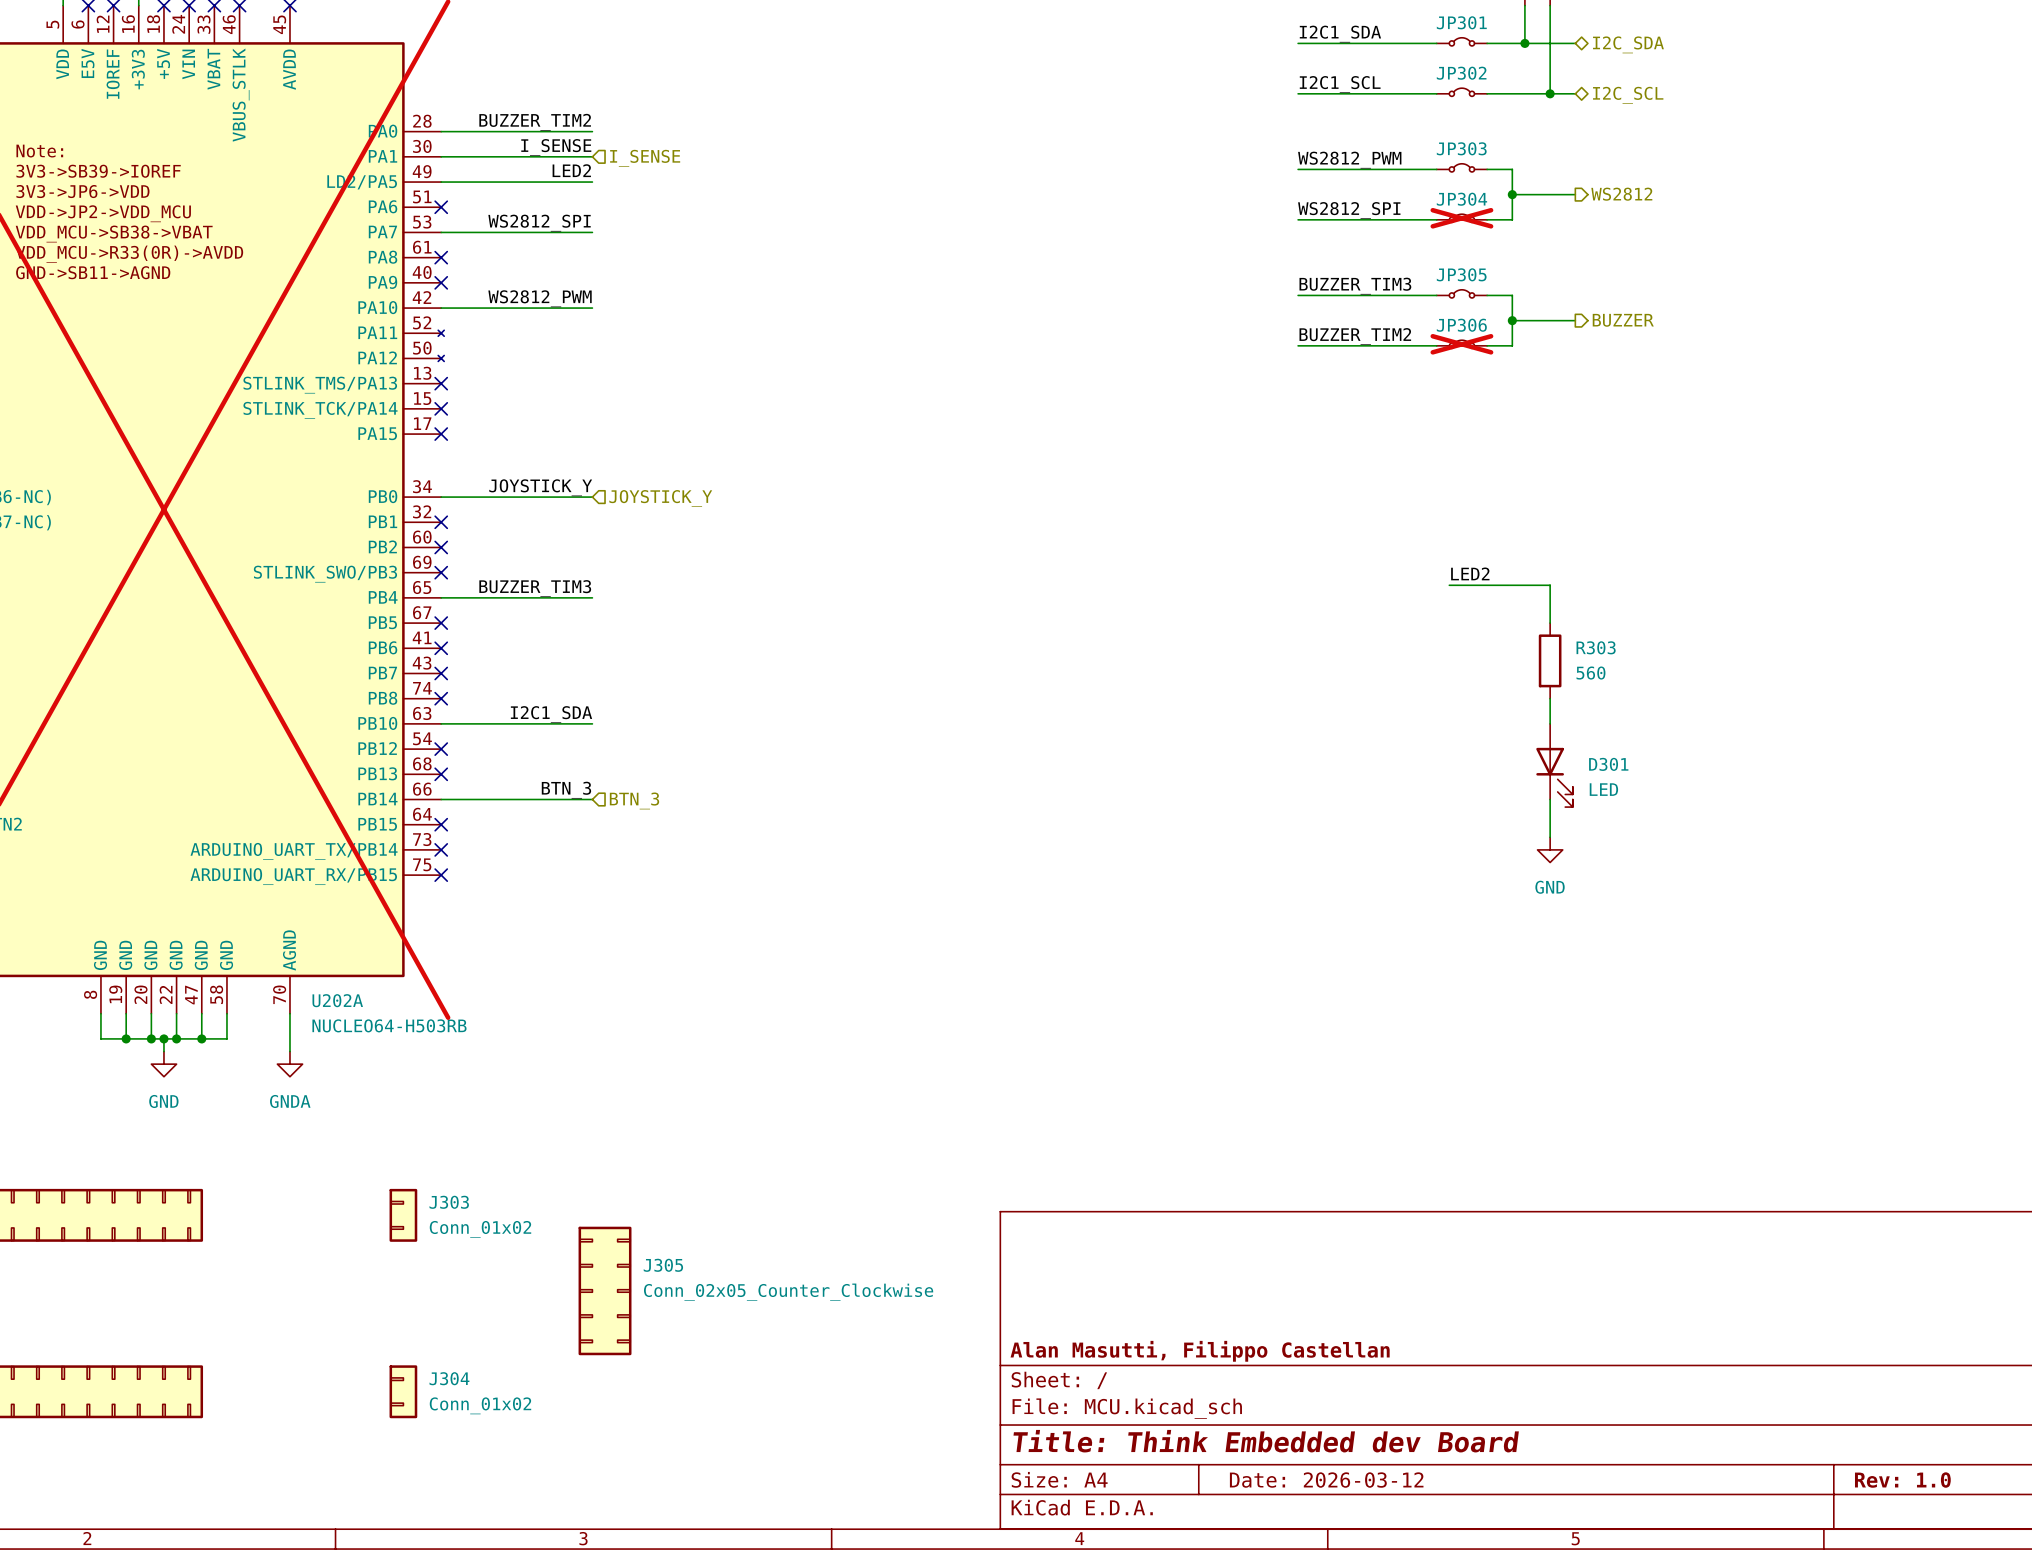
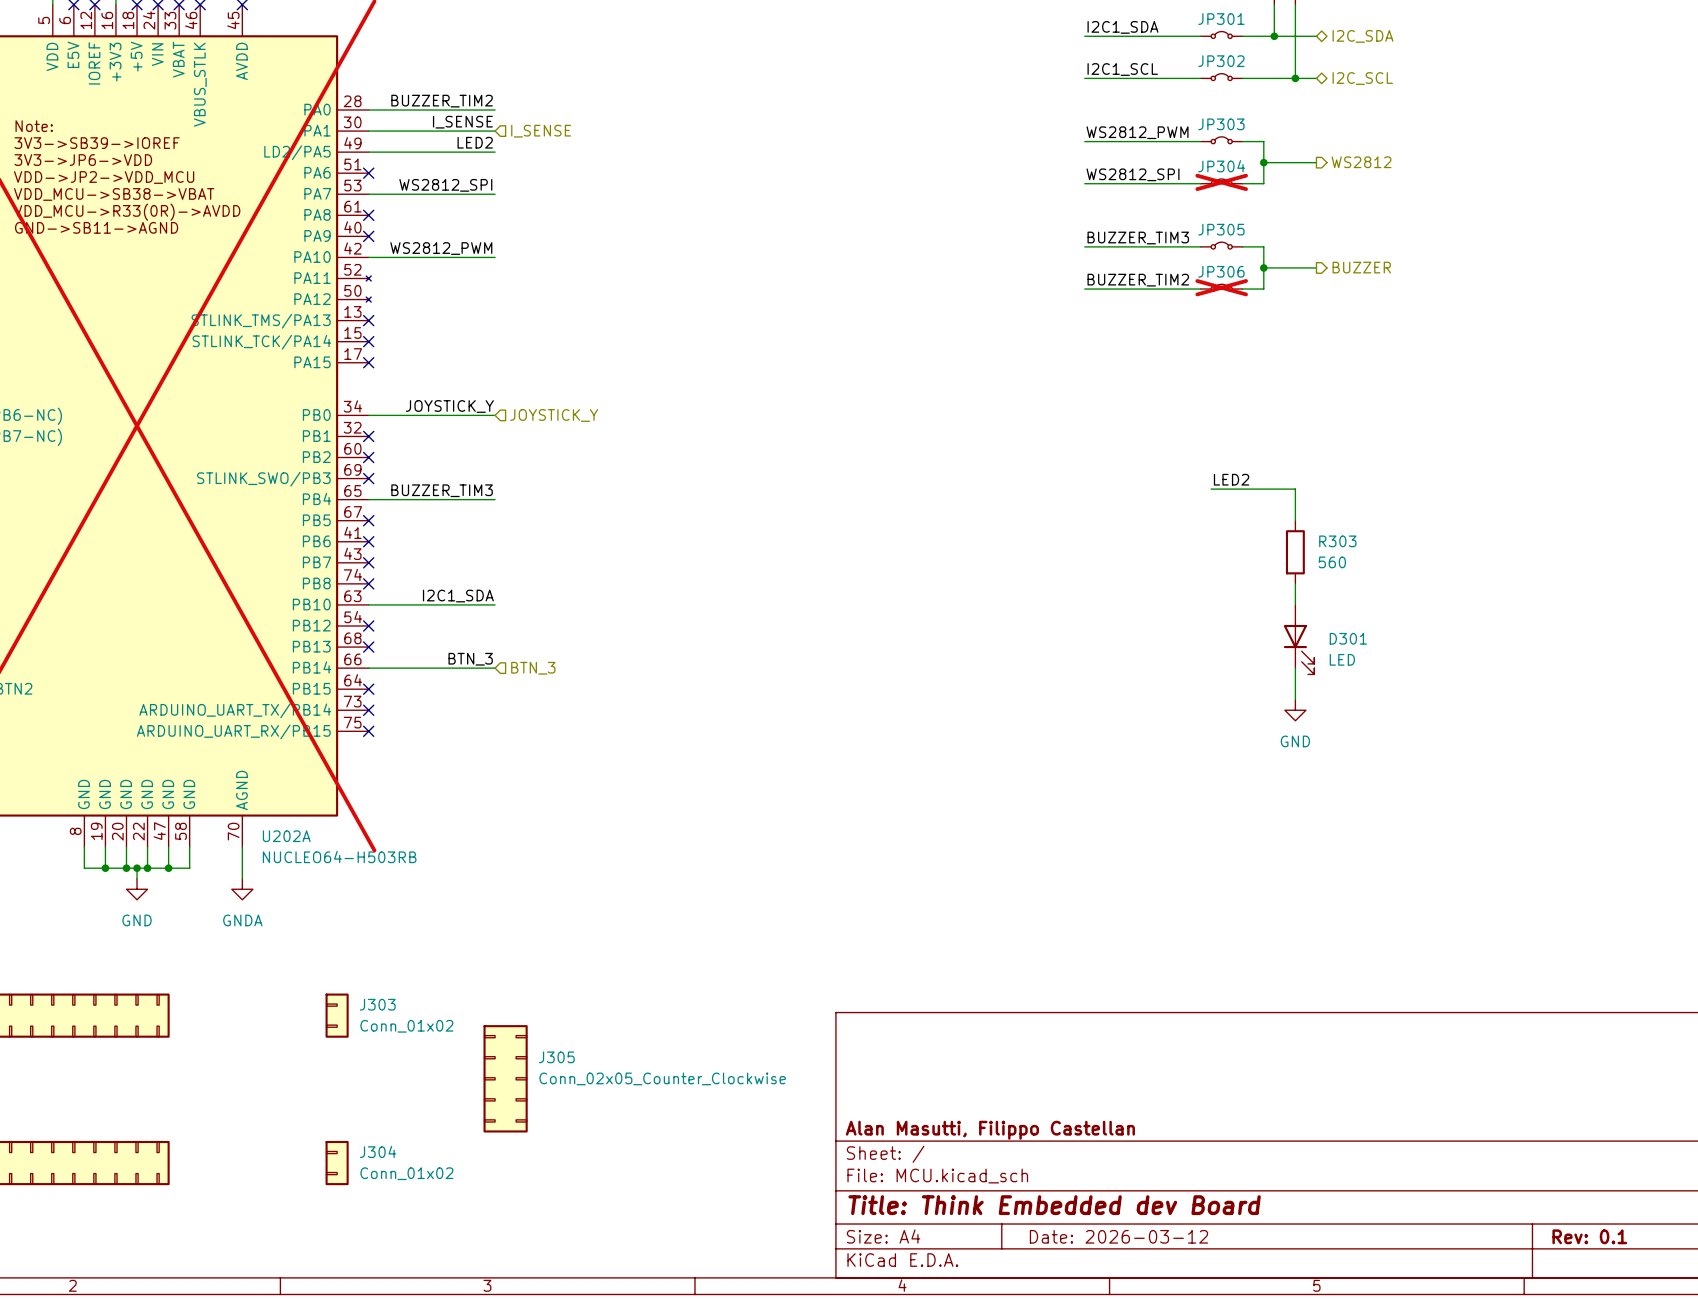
title block: Rev: 1.0 (1902, 1480) -> Rev: 0.1 (1589, 1236)

